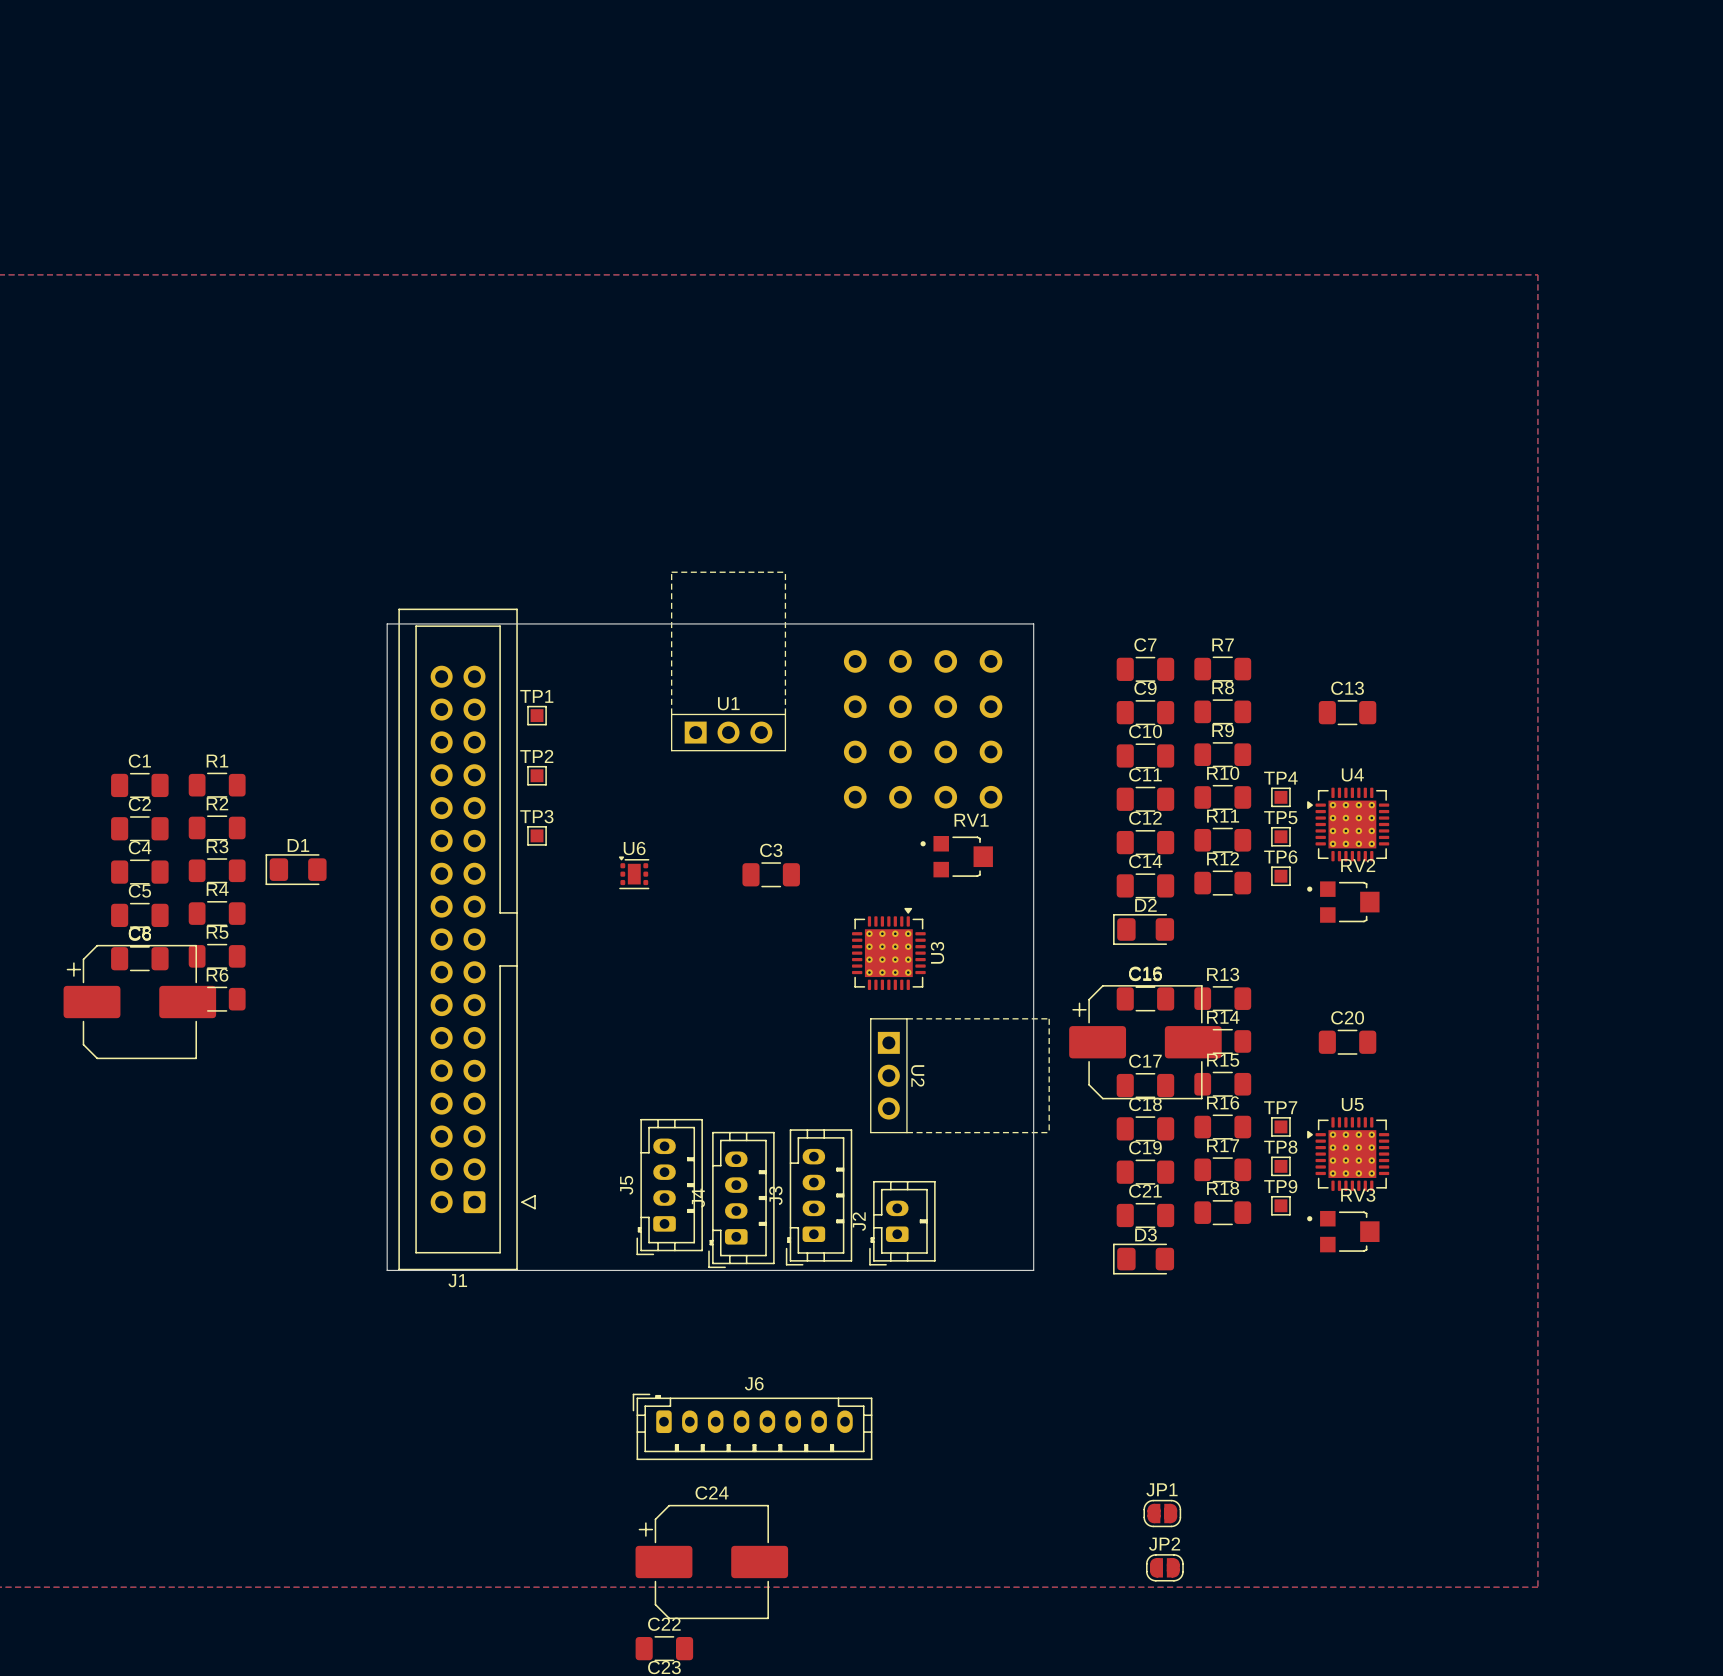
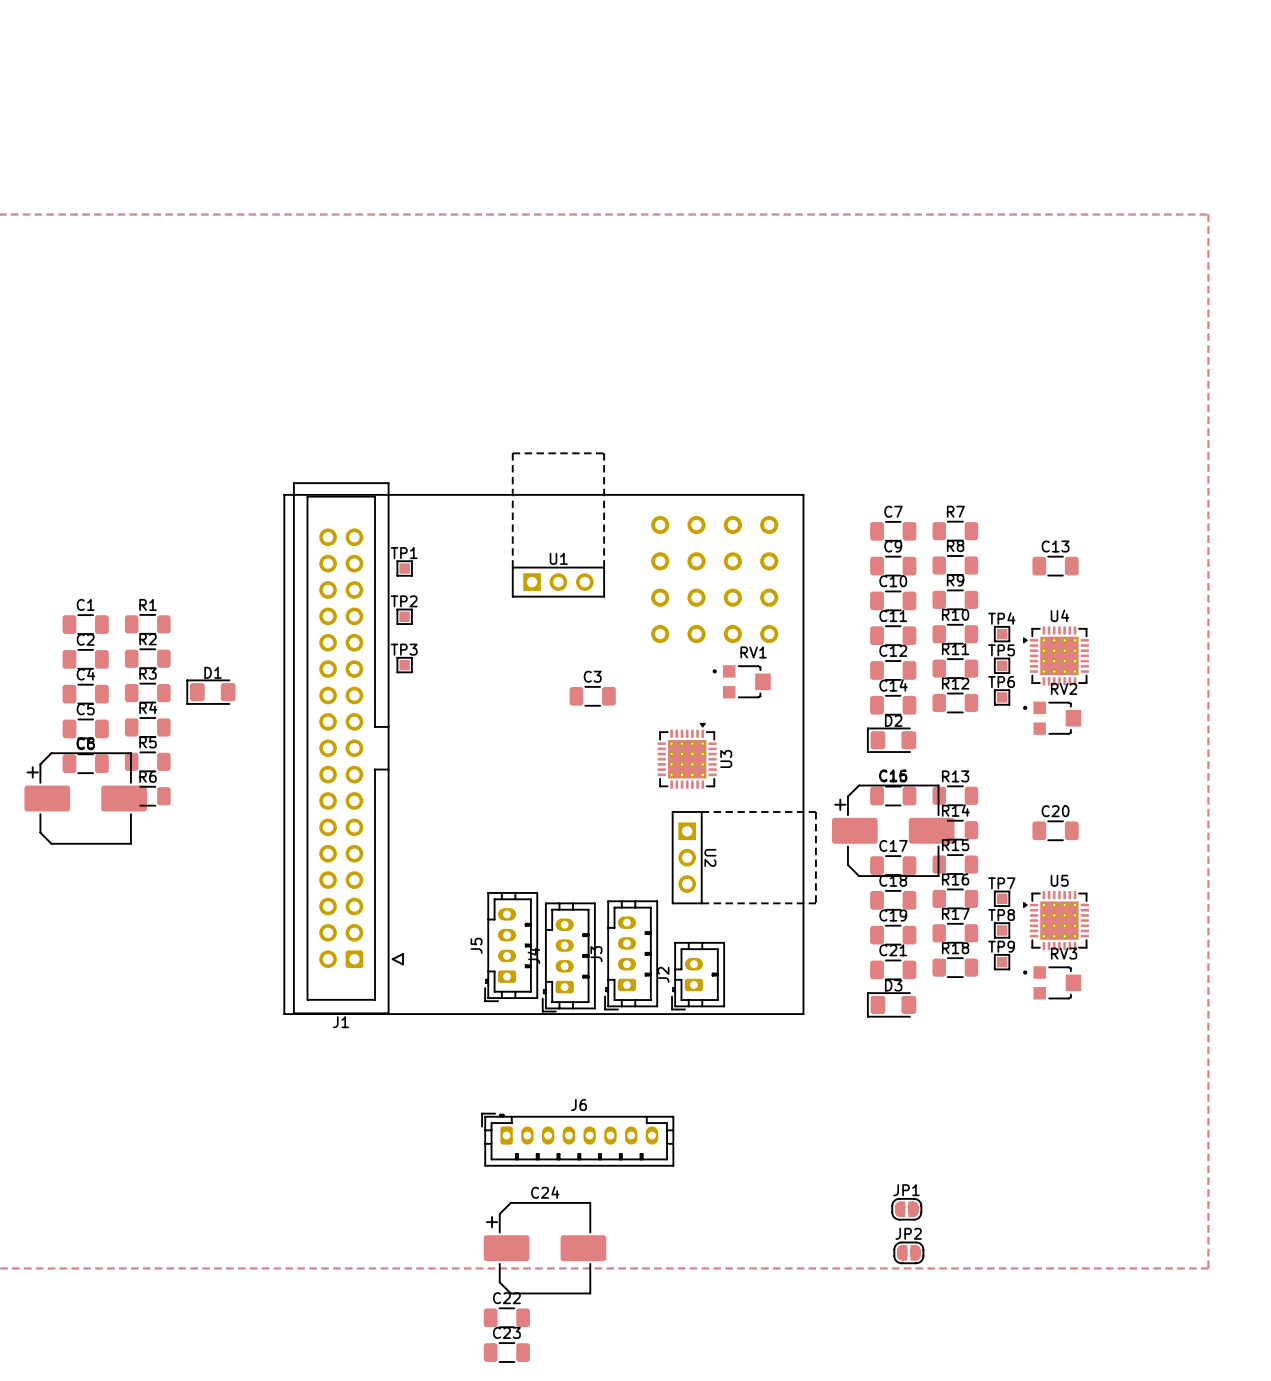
U6: (634, 872) -> none

